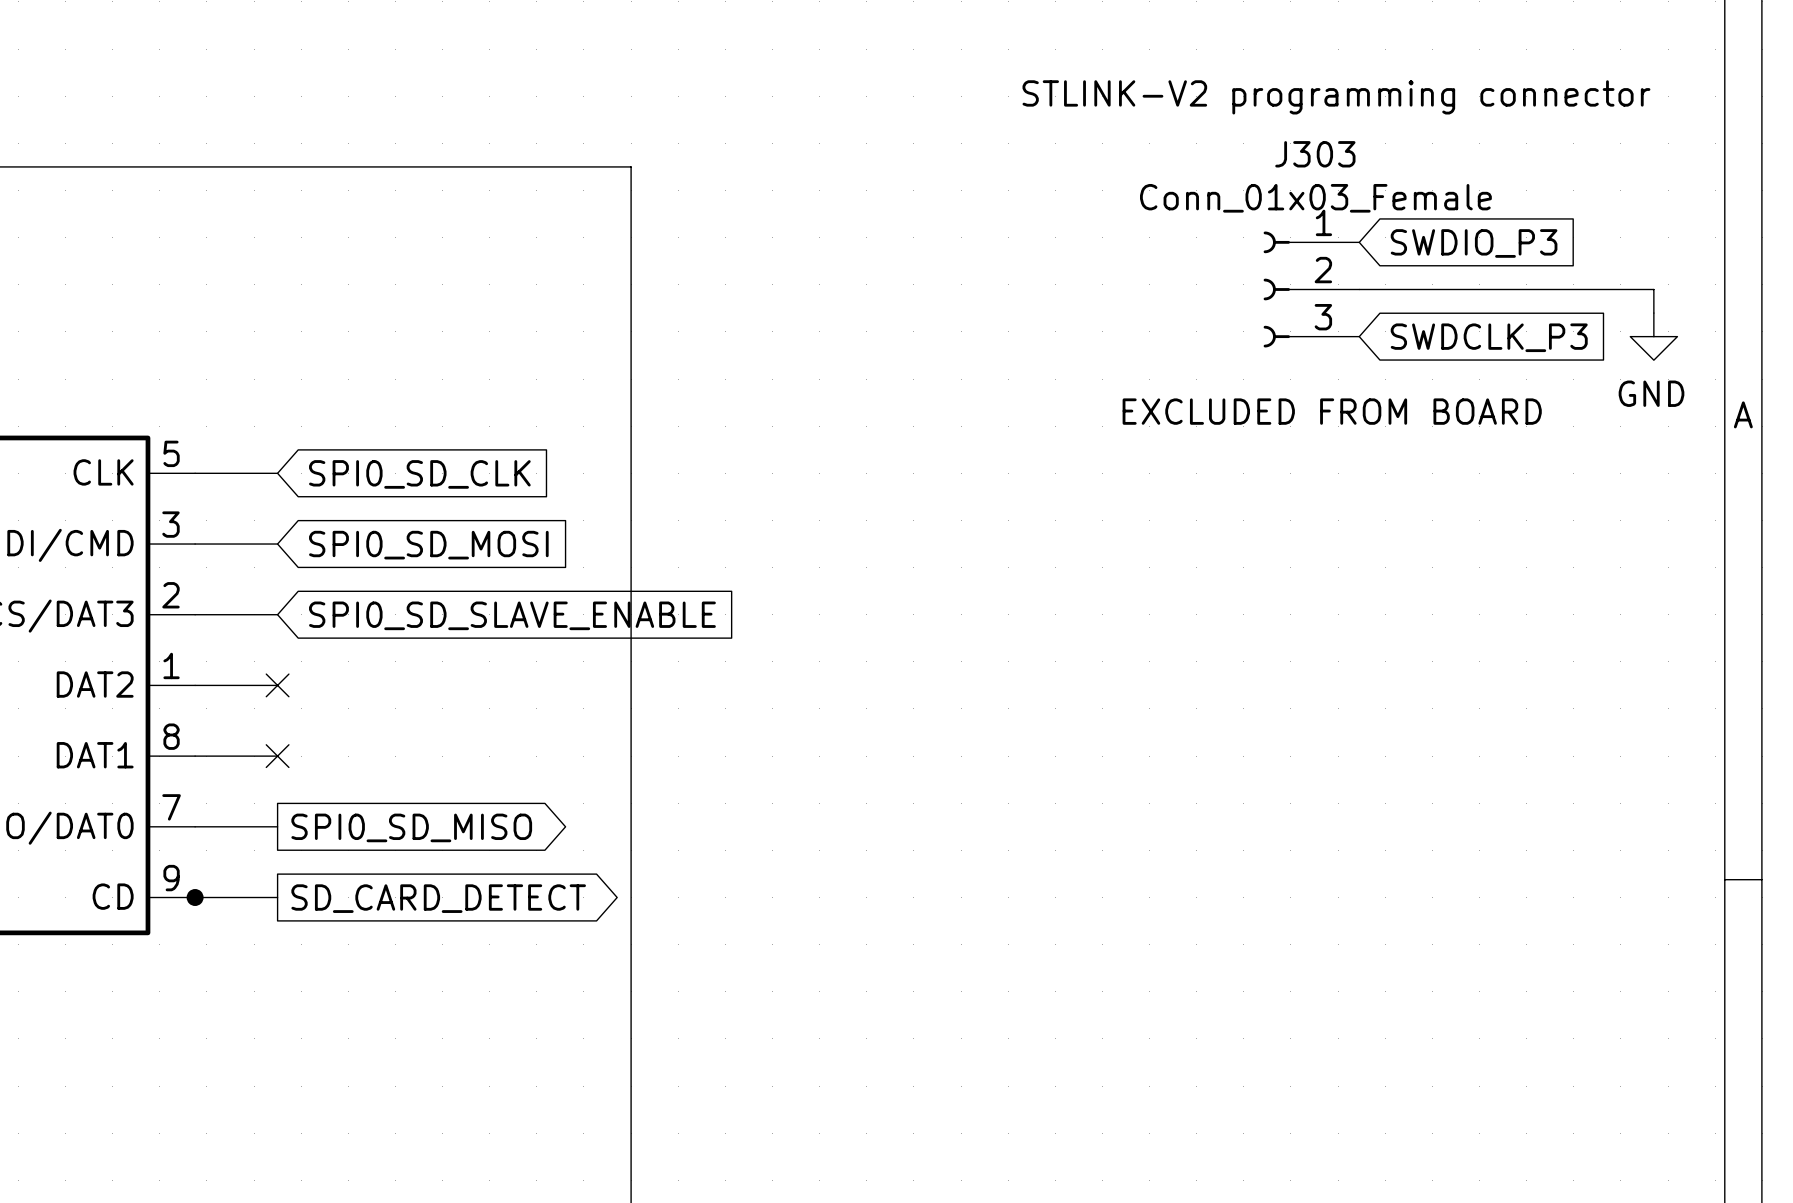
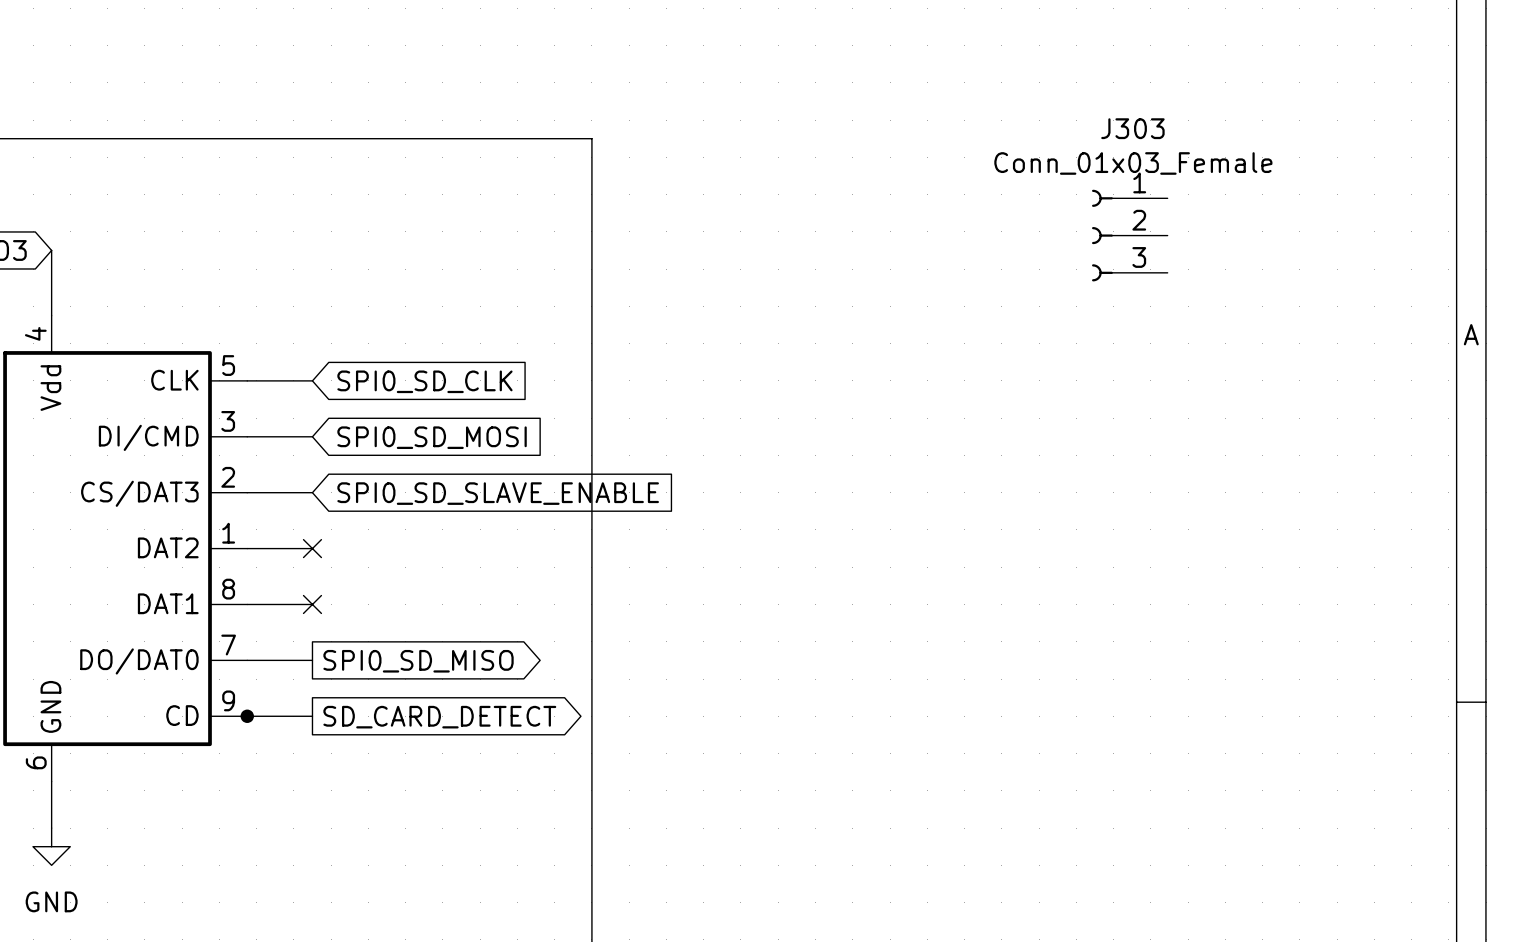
text: STLINK-V2 programming connector (1336, 97) -> none
global label: SWDIO_P3 (1474, 243) -> none
wire: (1359, 289) (1653, 289) (1653, 313) -> none
power symbol: GND (1653, 336) -> none
global label: SWDCLK_P3 (1489, 337) -> none
text: EXCLUDED FROM BOARD (1332, 411) -> none

